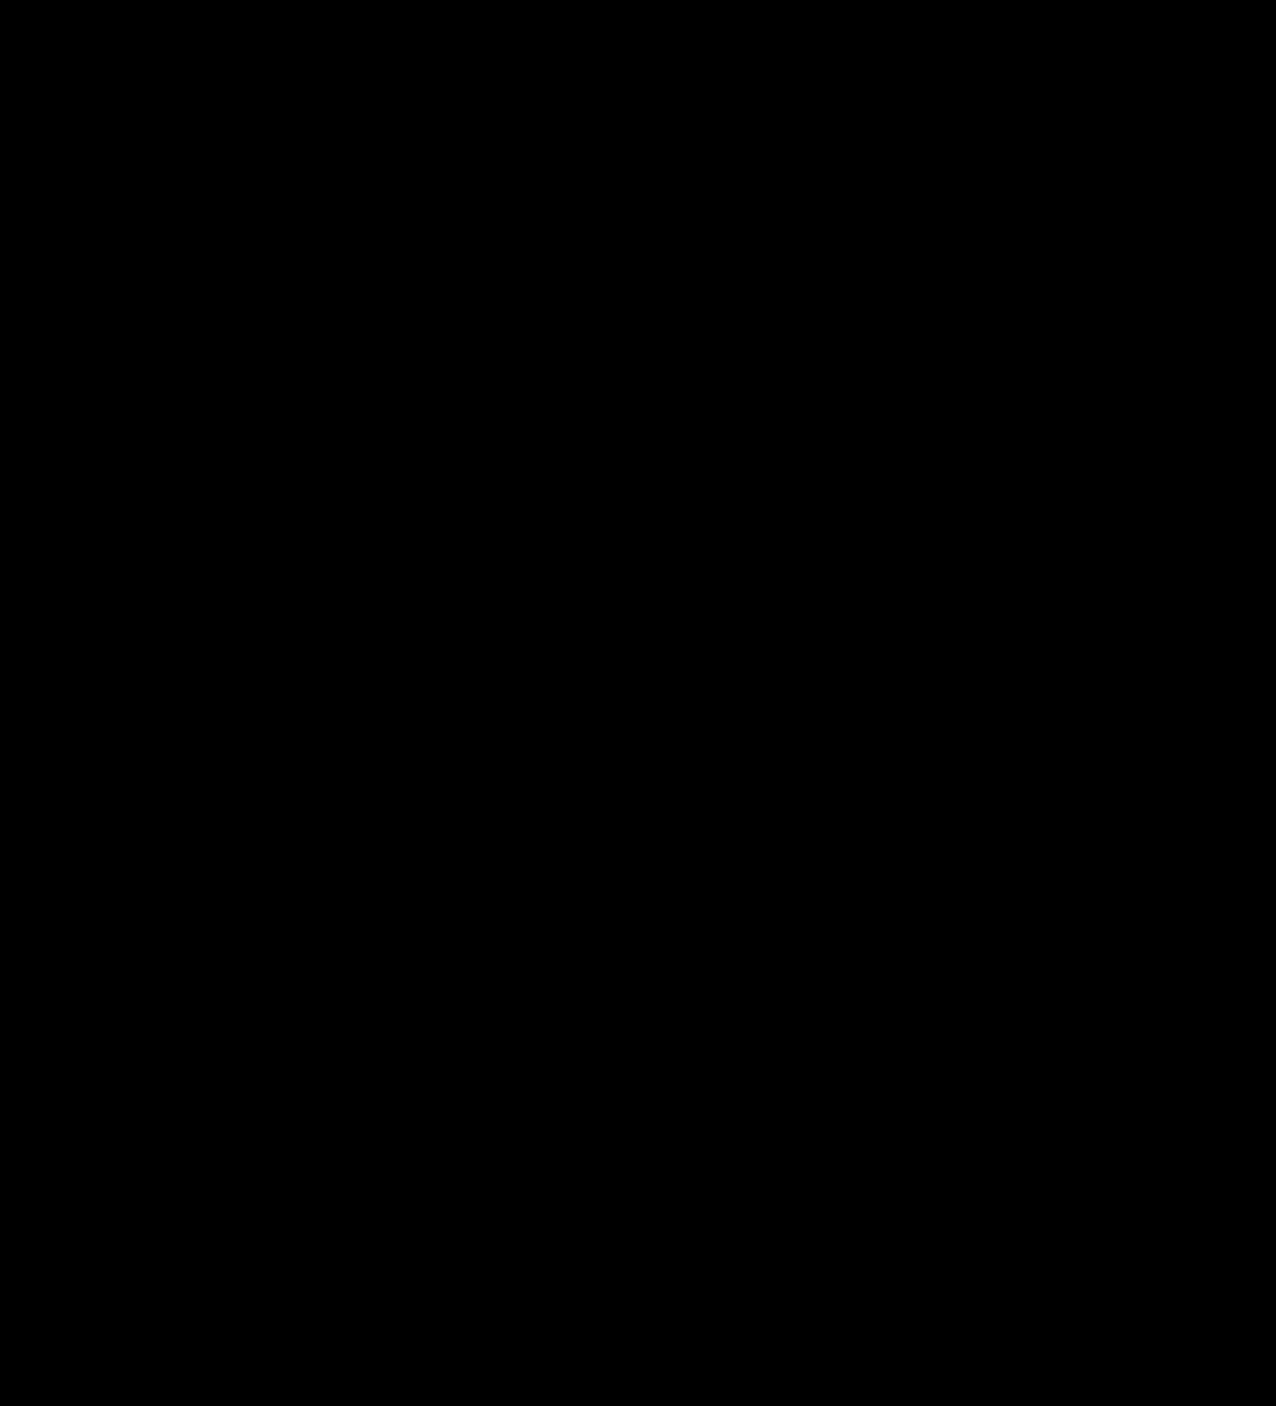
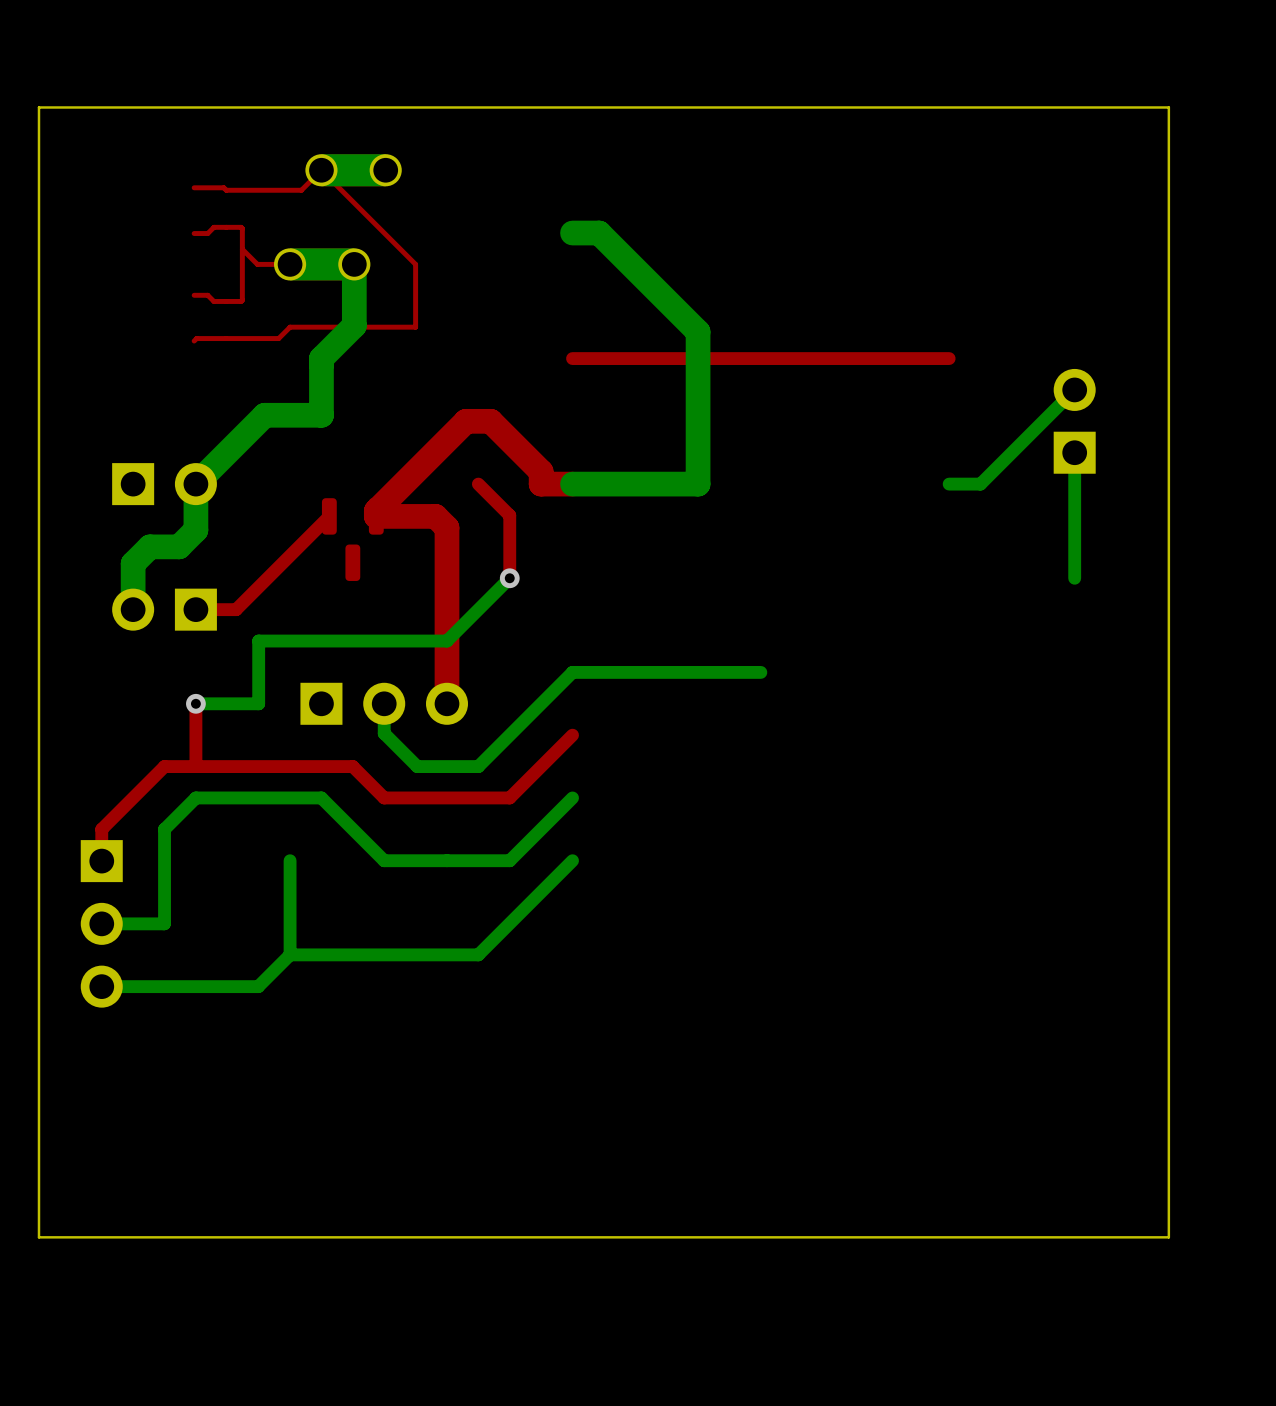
board edge: none -> (1168, 107) (38, 107) (38, 1237) (1168, 1237) (1168, 107)
part: none -> (353, 170)
top track: none -> (194, 187) (223, 187) (226, 190) (301, 190) (321, 170) (415, 264) (415, 327) (290, 327) (278, 338) (196, 338) (194, 341)
top track: none -> (194, 233) (207, 233) (213, 227) (242, 228) (242, 300) (213, 301) (207, 295) (194, 295)
bottom track: none -> (572, 233) (599, 233) (698, 331) (698, 484) (572, 484)
top track: none -> (242, 249) (257, 264) (290, 264)
part: none -> (322, 264)
bottom track: none -> (354, 264) (354, 325) (321, 358) (321, 415) (264, 415) (195, 484) (195, 530) (179, 546) (149, 546) (133, 563) (133, 609)
top track: none -> (949, 358) (572, 358)
bottom track: none -> (1074, 389) (980, 484) (949, 484)
part: none -> (1074, 421)
bottom track: none -> (1074, 452) (1074, 578)
part: none -> (164, 484)
top track: none -> (478, 484) (509, 515) (509, 578)
top track: none -> (572, 484) (541, 484) (541, 471) (490, 421) (466, 421) (376, 511) (376, 516) (435, 516) (446, 527) (446, 703)
top track: none -> (329, 516) (236, 609) (195, 609)
part: none -> (352, 539)
bottom track: none -> (509, 578) (446, 641) (258, 641) (258, 703) (195, 703)
via: none -> (509, 578)
part: none -> (164, 609)
bottom track: none -> (760, 672) (572, 672) (478, 766) (417, 766) (384, 733) (384, 703)
top track: none -> (195, 703) (195, 766)
via: none -> (195, 703)
part: none -> (384, 703)
top track: none -> (572, 735) (509, 797) (384, 797) (352, 766) (164, 766) (101, 829) (101, 861)
bottom track: none -> (572, 797) (509, 860) (384, 860) (321, 797) (195, 797) (164, 829) (164, 923) (101, 923)
bottom track: none -> (290, 860) (290, 954)
bottom track: none -> (572, 860) (478, 954) (290, 954)
part: none -> (101, 923)
bottom track: none -> (290, 954) (258, 986) (101, 986)

